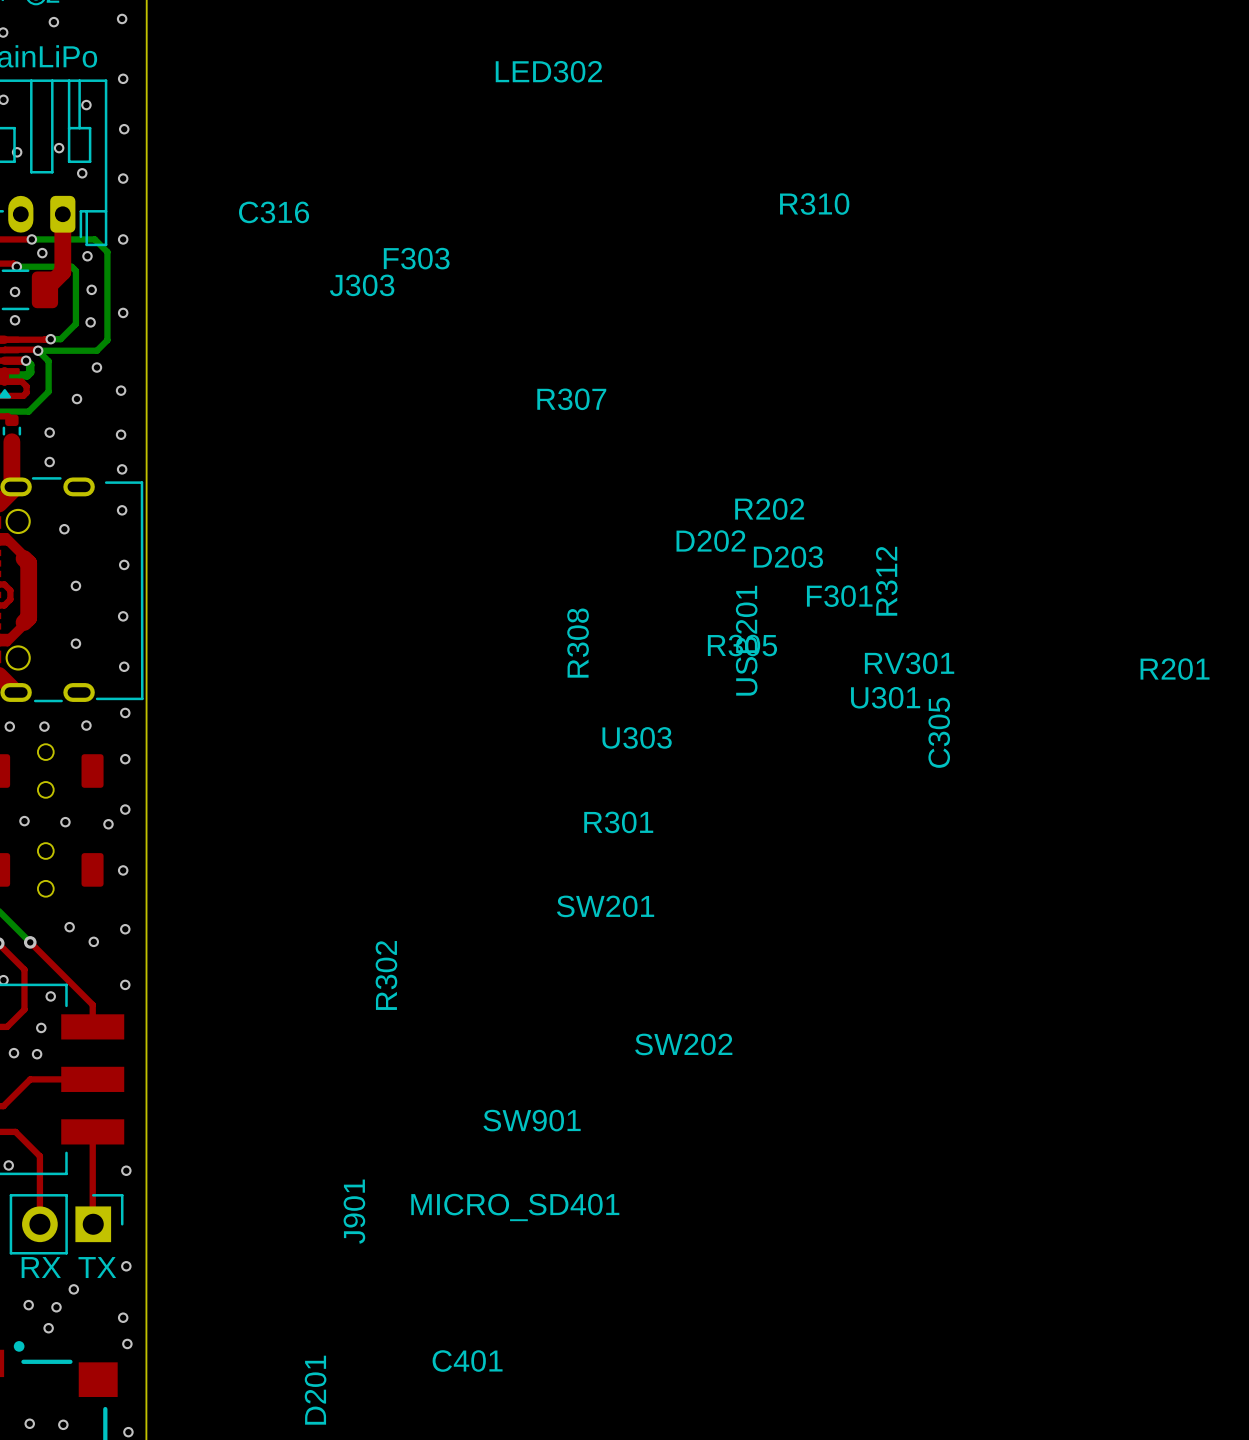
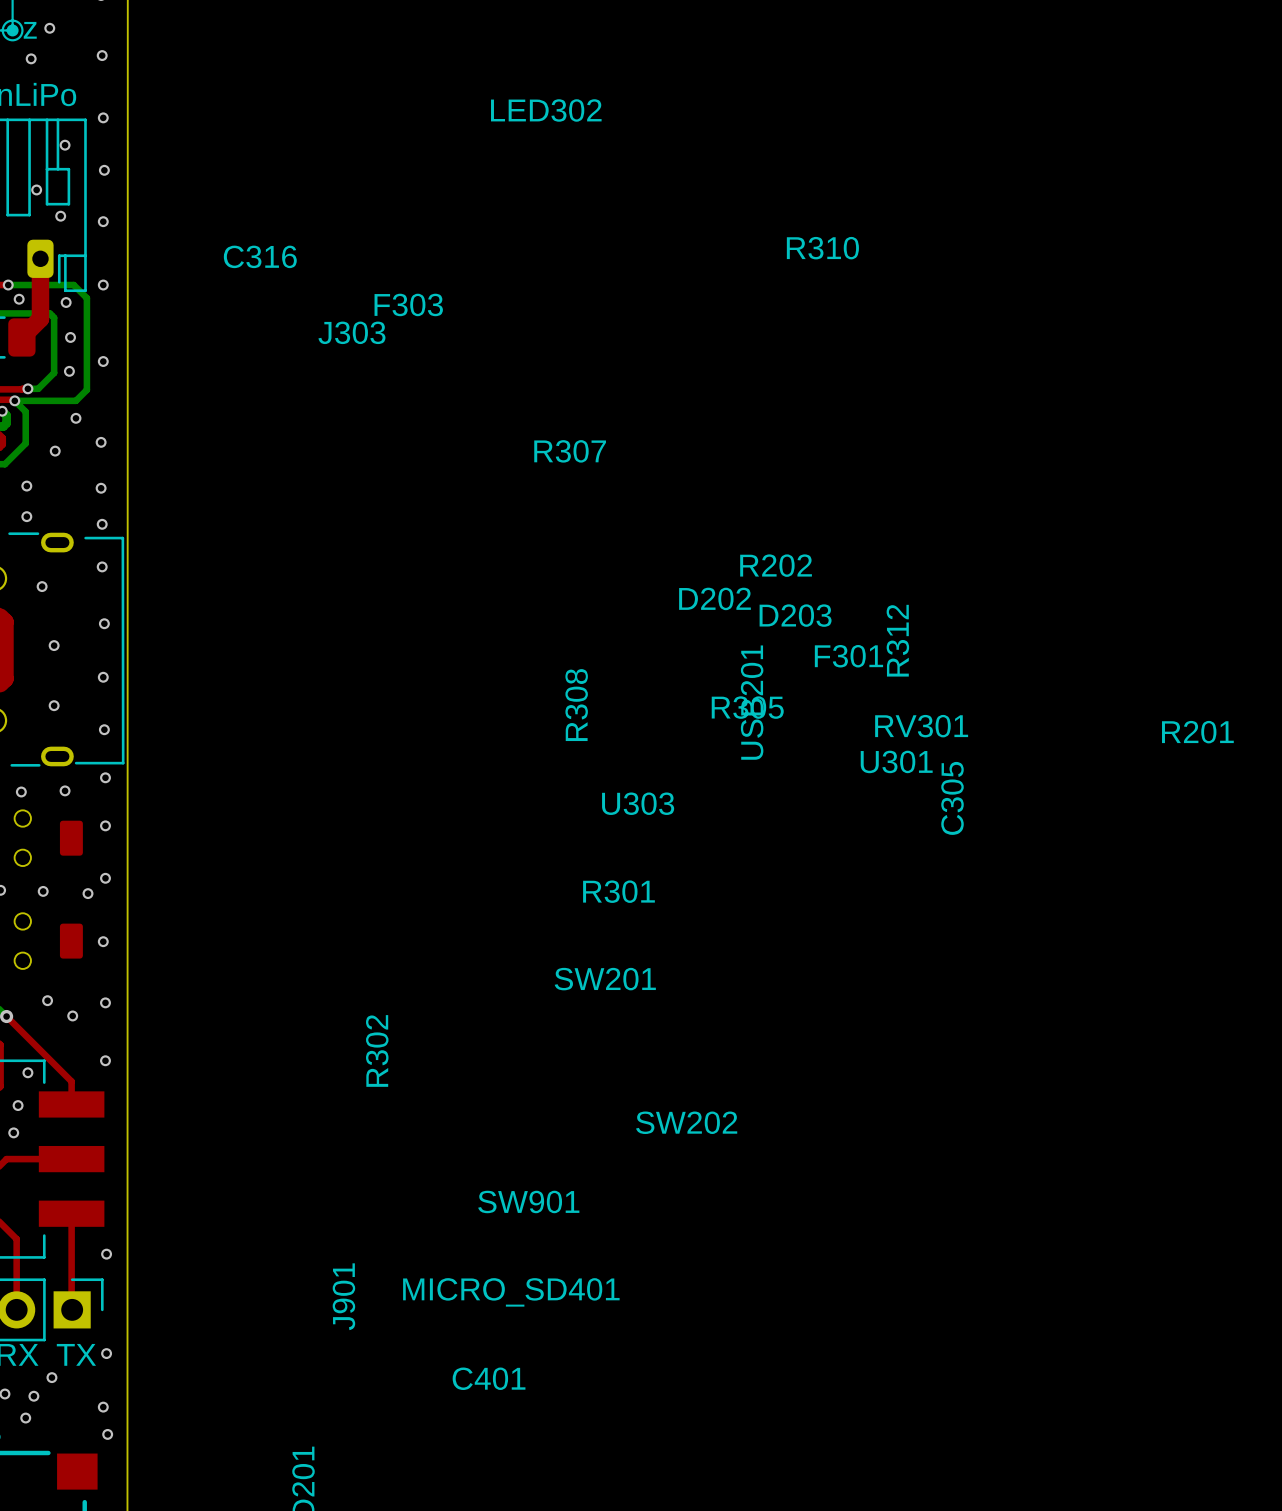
C401 name position: C401 (467, 1361) -> C401 (489, 1378)

